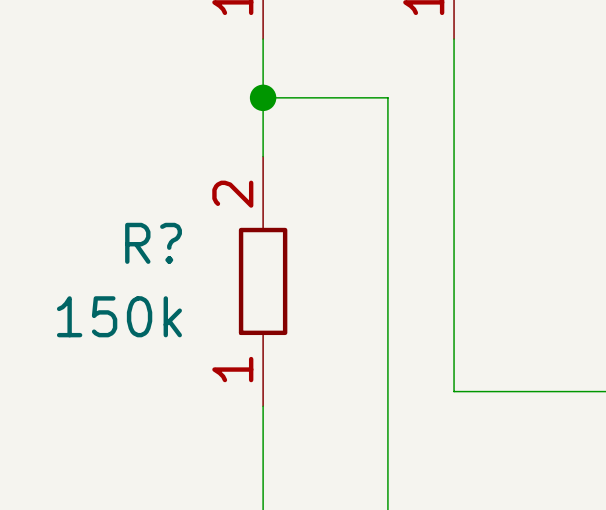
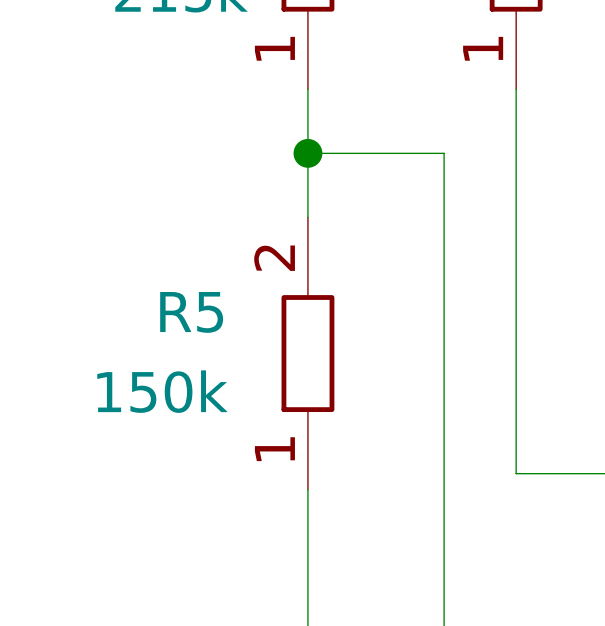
R? name: R? (153, 243) -> R5 (191, 312)

